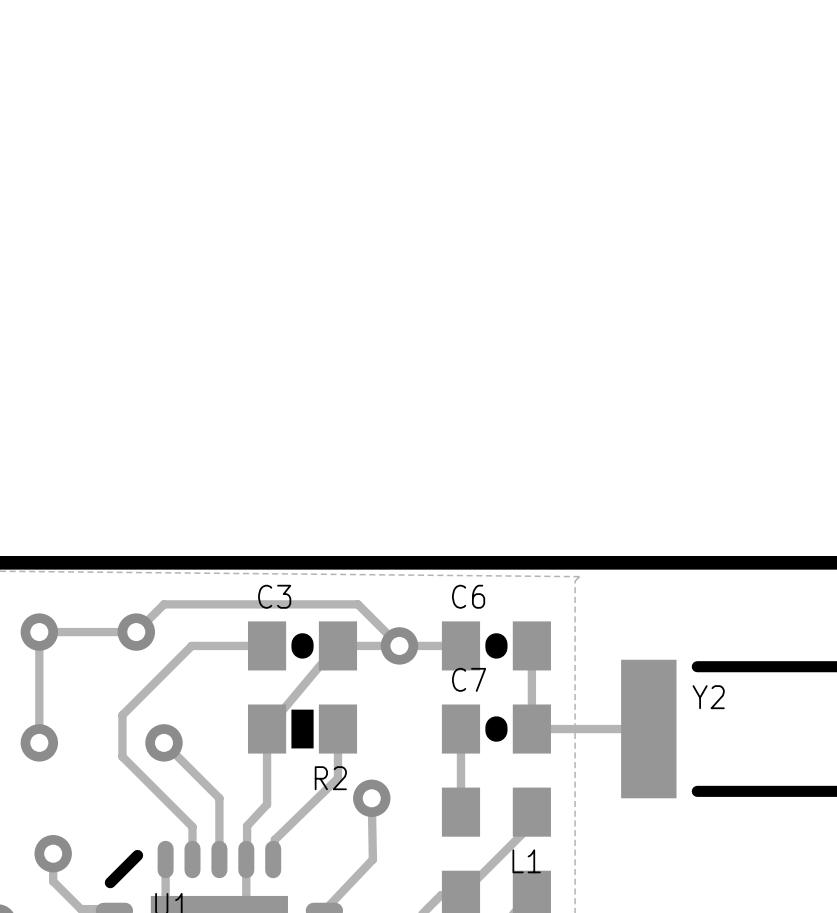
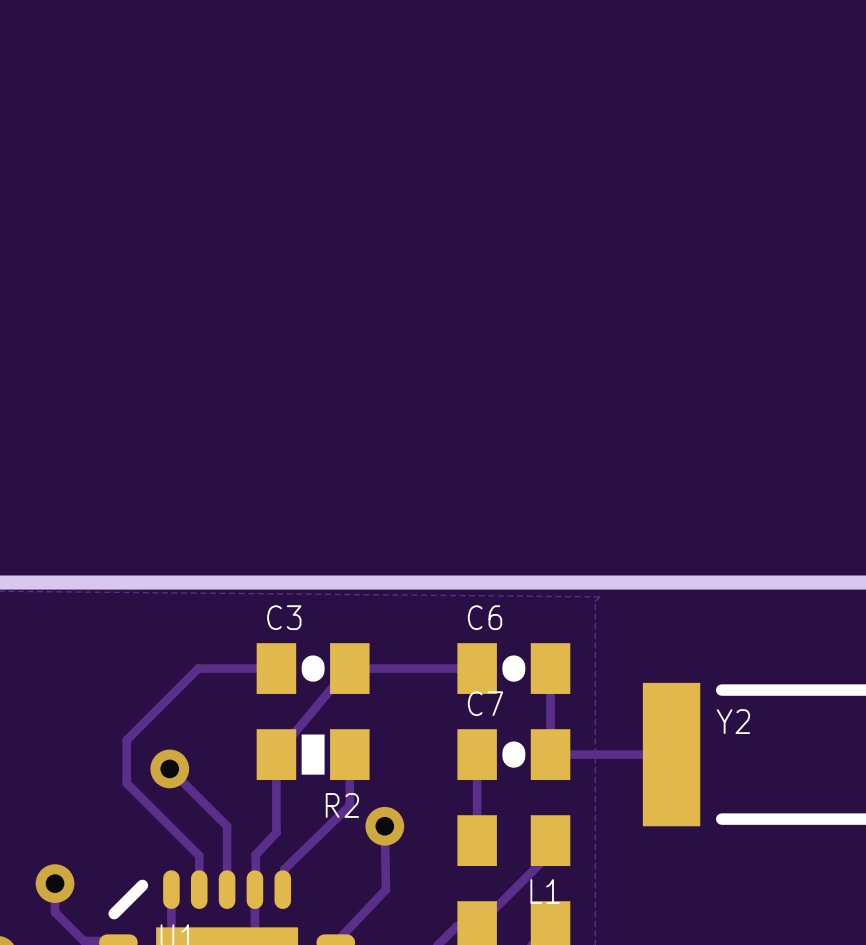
via: (39, 632) -> none
via: (136, 632) -> none
track: (399, 645) (357, 604) (163, 604) (136, 632) (39, 632) (39, 742) -> none
via: (399, 645) -> none
via: (39, 742) -> none

